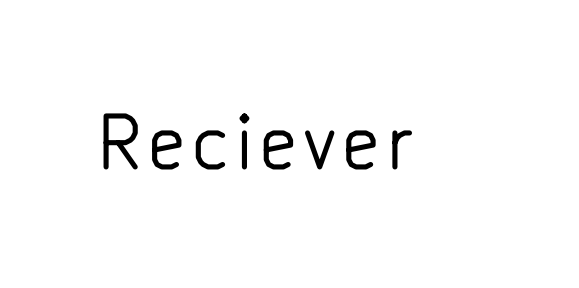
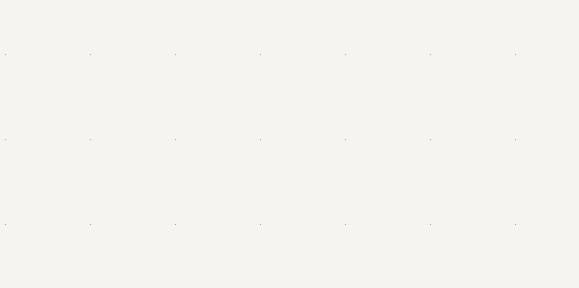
text: Reciever (257, 141) -> none

